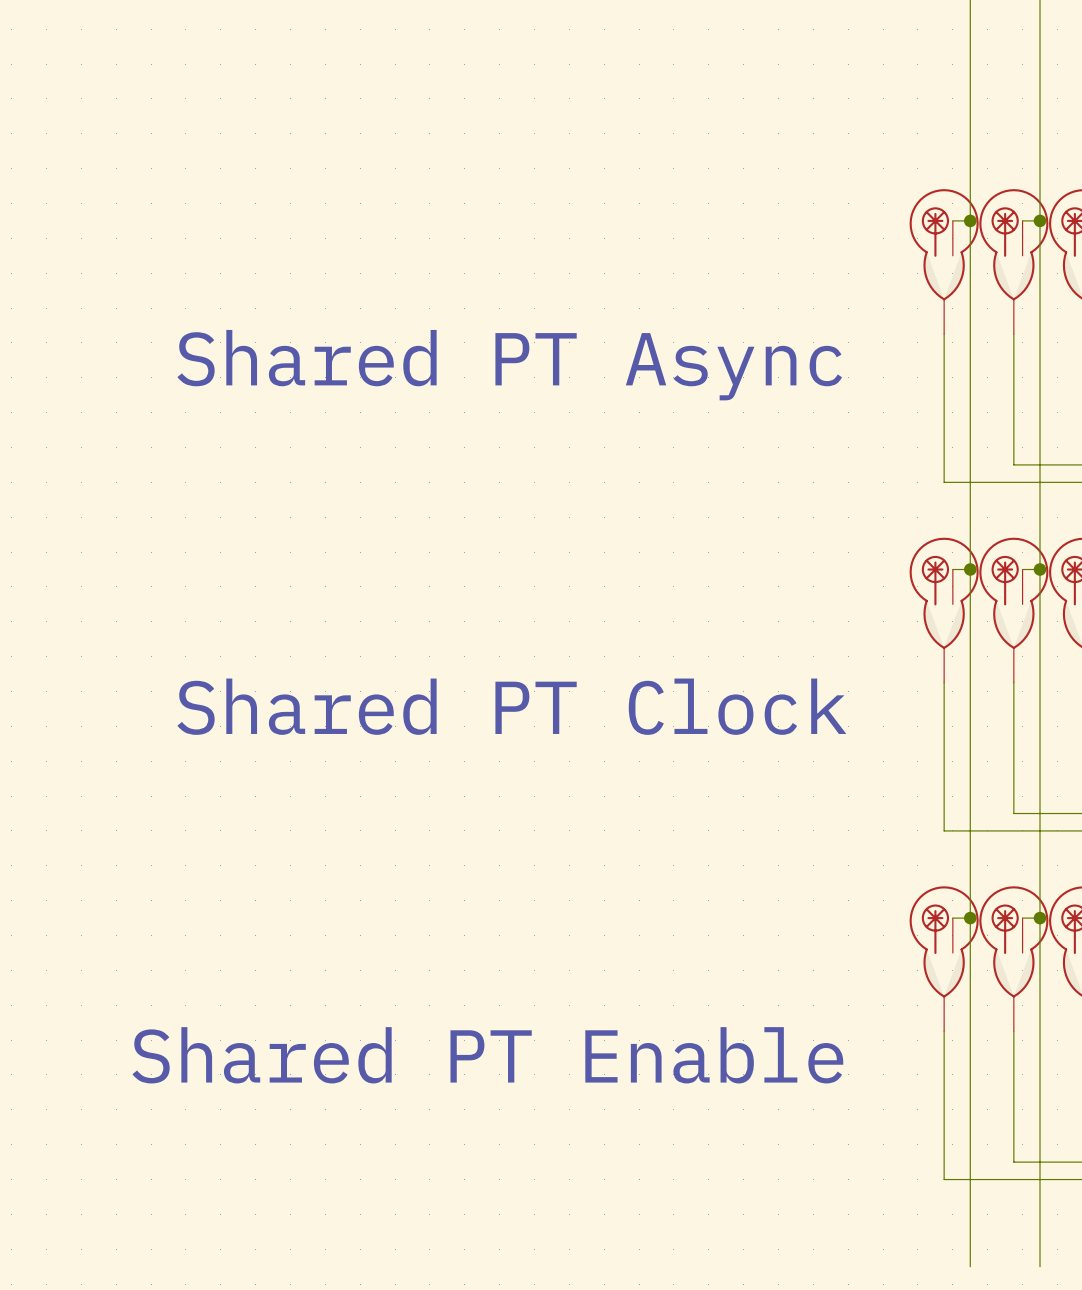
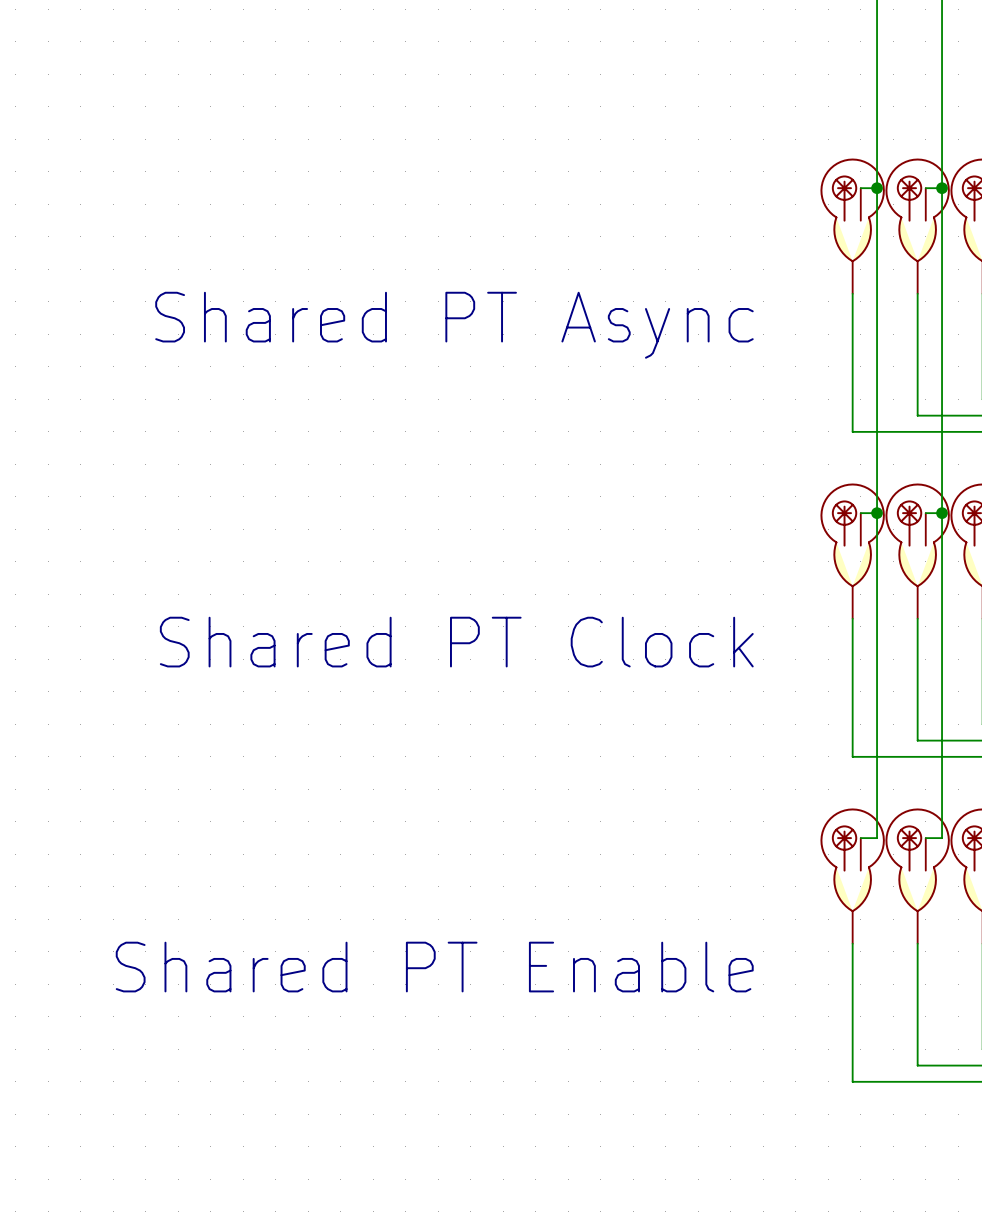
wire: (970, 918) (970, 1266) -> none
junction: (970, 918) -> none
wire: (1040, 918) (1040, 1266) -> none
junction: (1040, 918) -> none

